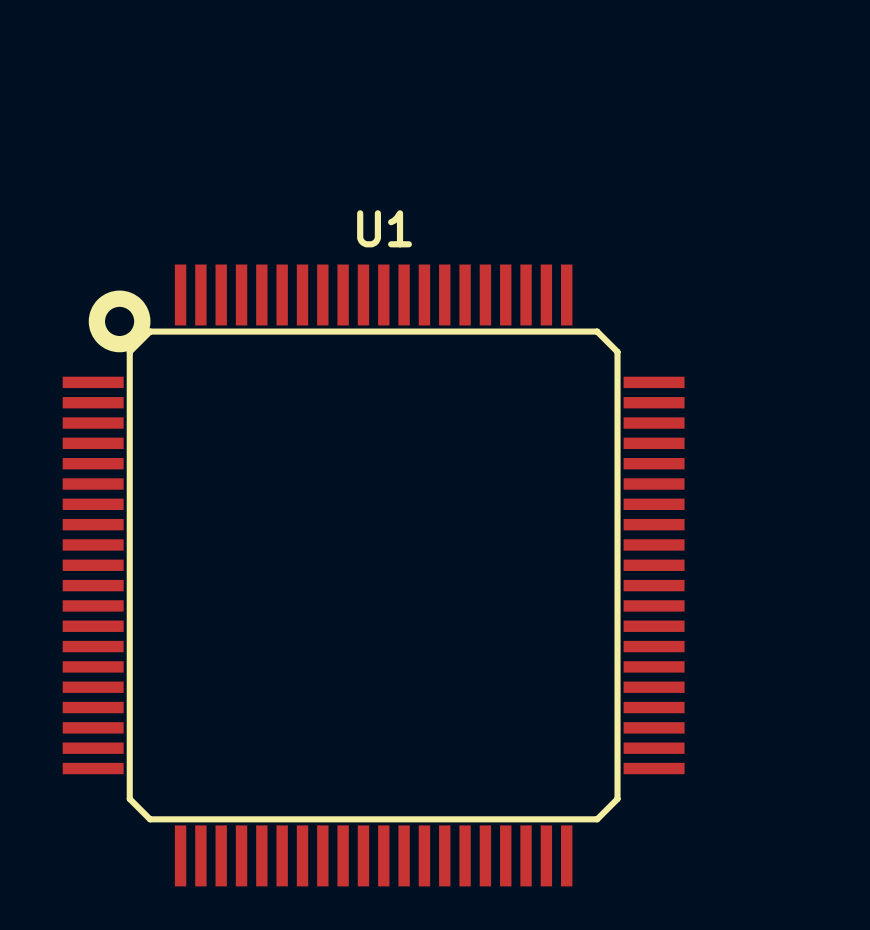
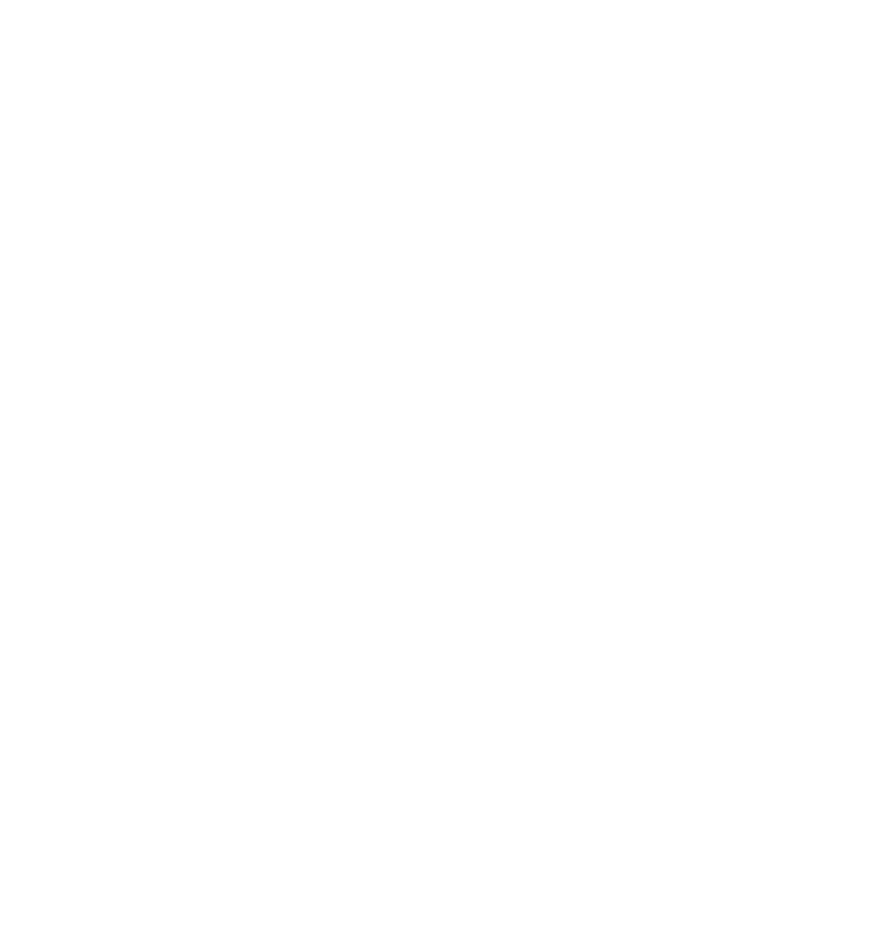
U1: (373, 575) -> none

